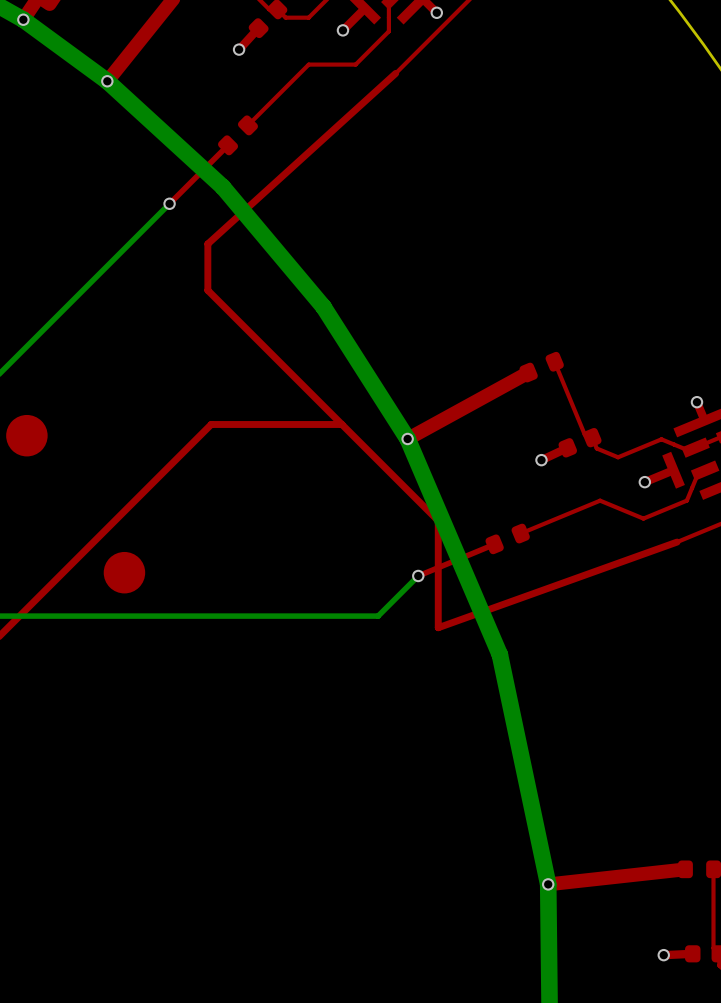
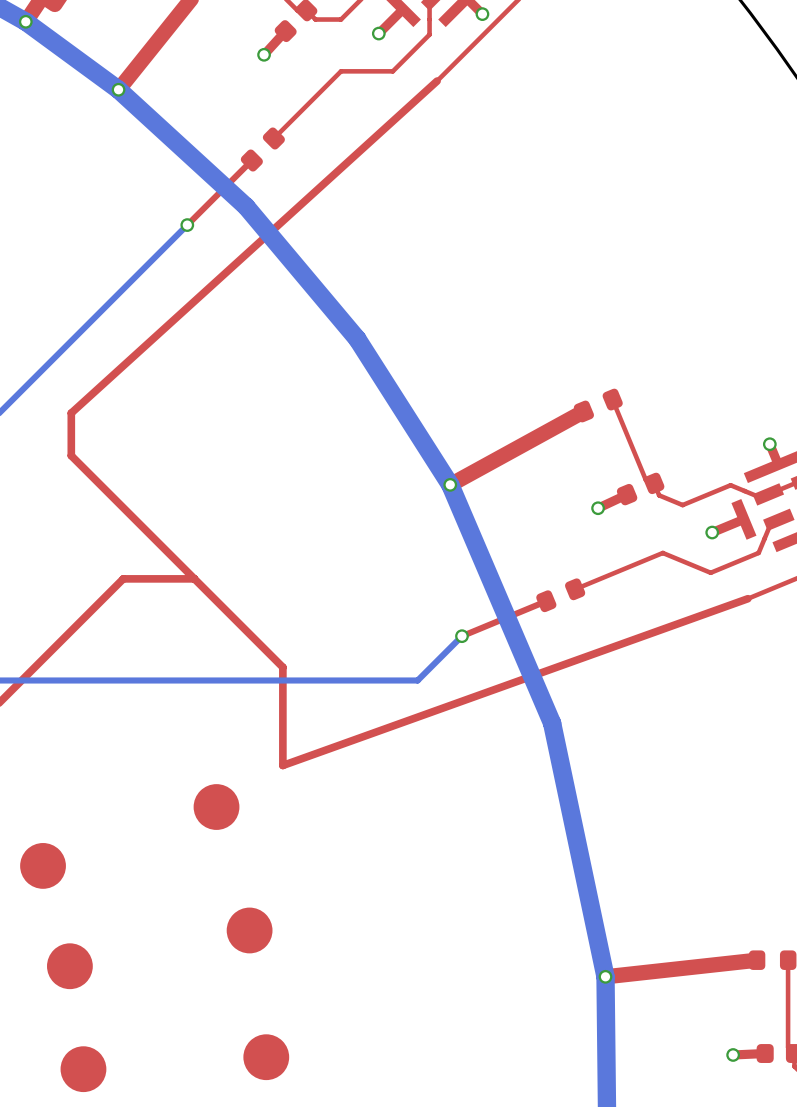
top track: (207, 243) (207, 290) (438, 520) (438, 627) -> (229, 269) (71, 413) (71, 455) (282, 667) (282, 765) (484, 693)
top track: (341, 424) (211, 424) (111, 524) -> (194, 578) (123, 578)
part: (26, 435) -> none
part: (124, 572) -> none
part: none -> (216, 807)
part: none -> (43, 865)
part: none -> (249, 930)
part: none -> (69, 966)
part: none -> (266, 1057)
part: none -> (83, 1069)

